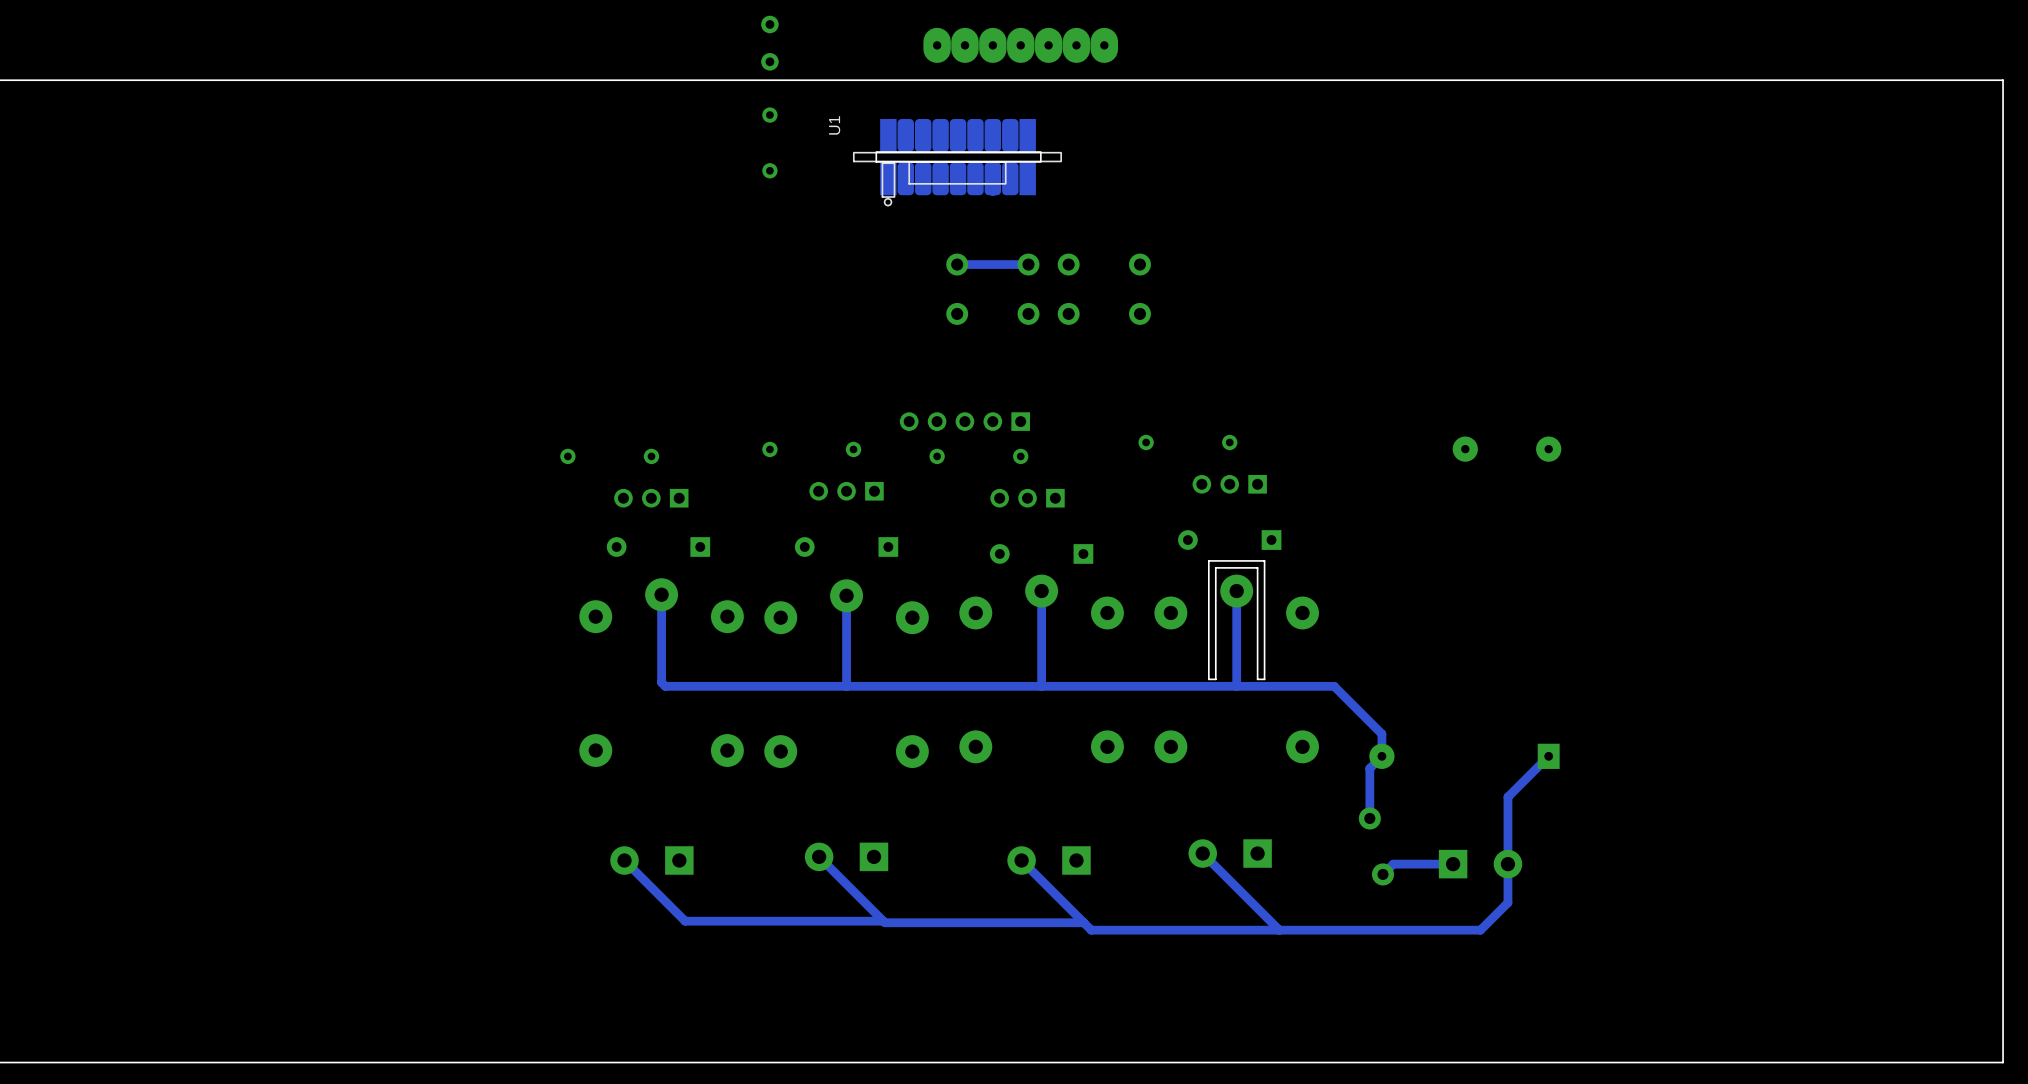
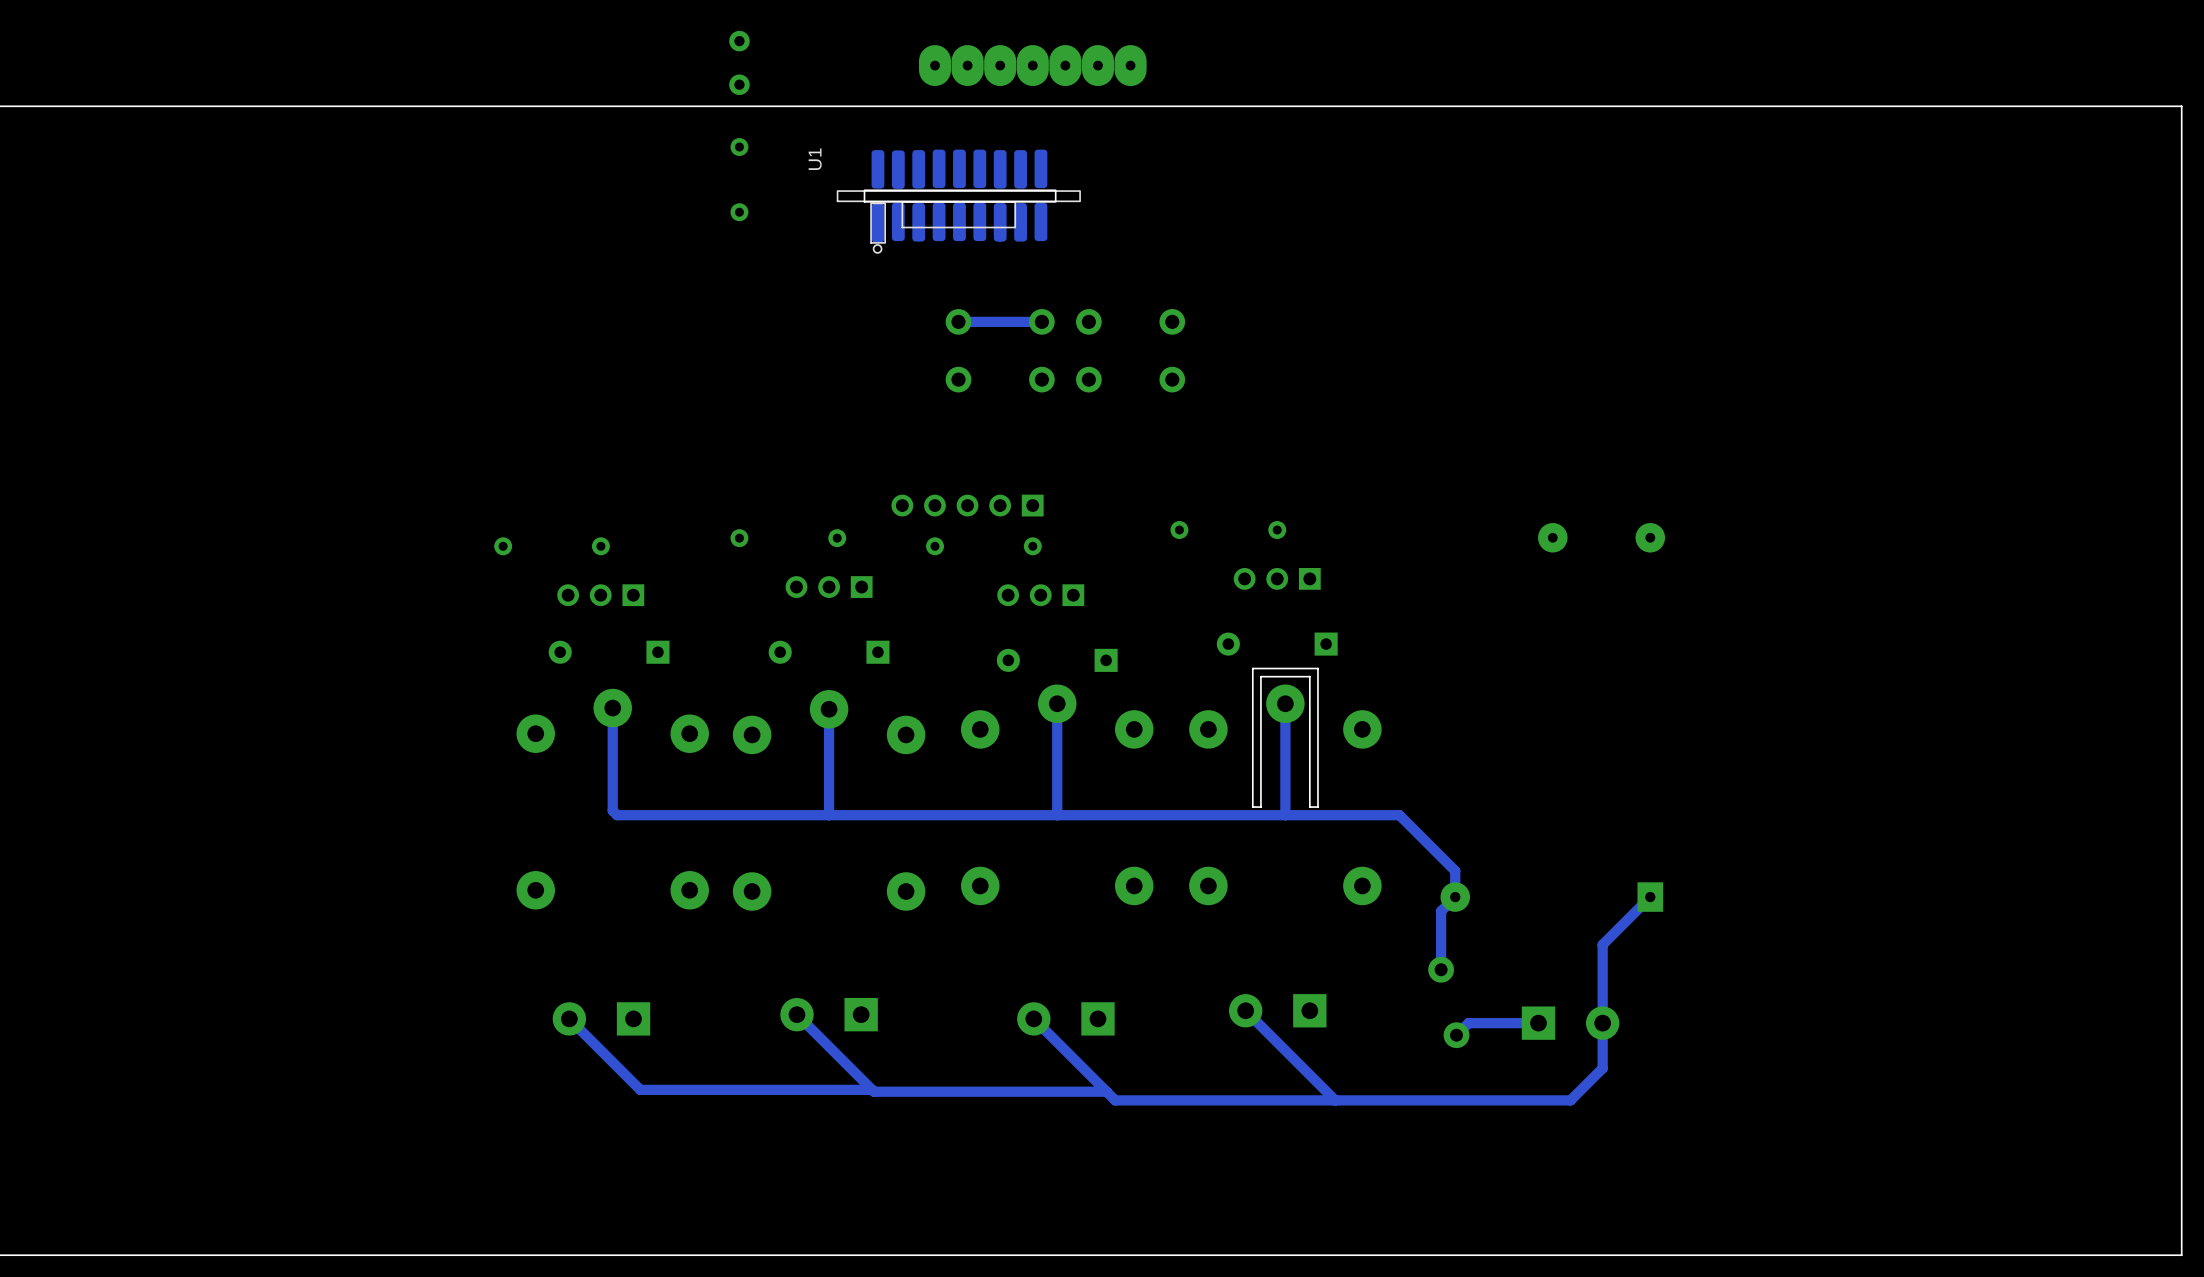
U1 footprint: [853, 119, 1062, 207] -> [836, 149, 1081, 254]

